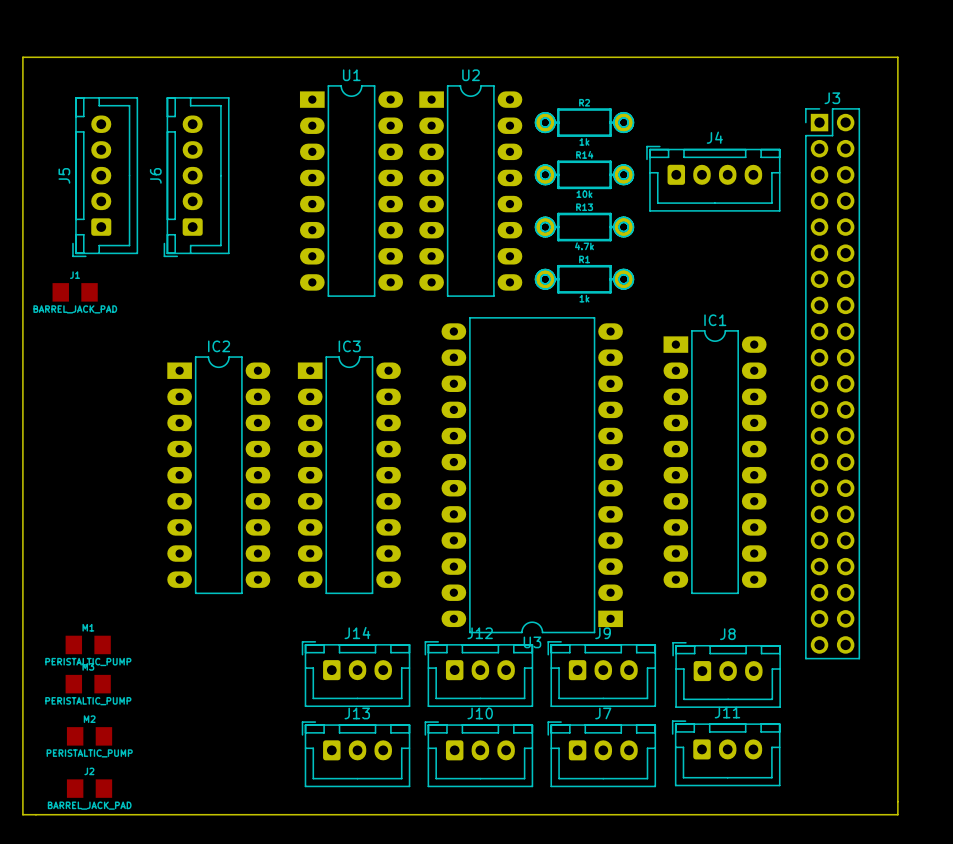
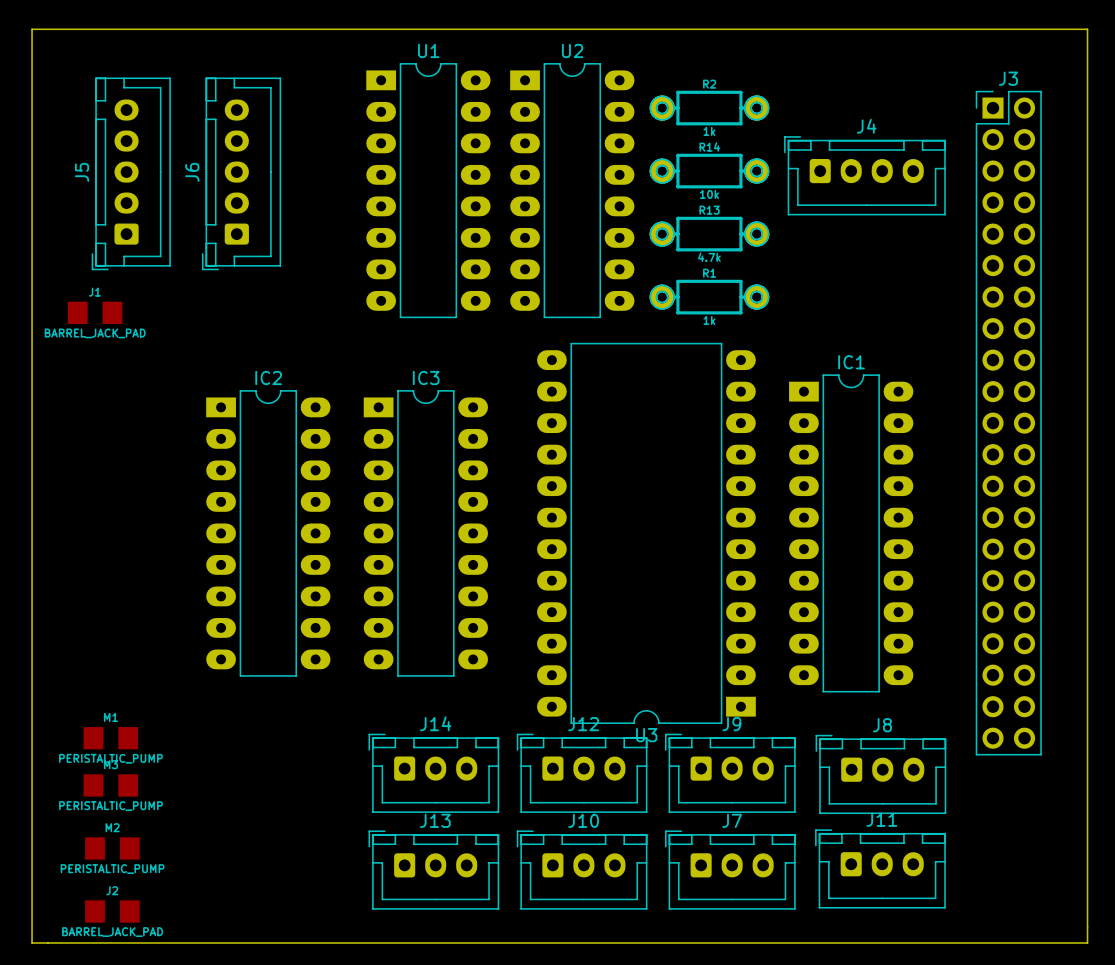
IC1 position: (715, 462) -> (851, 533)

